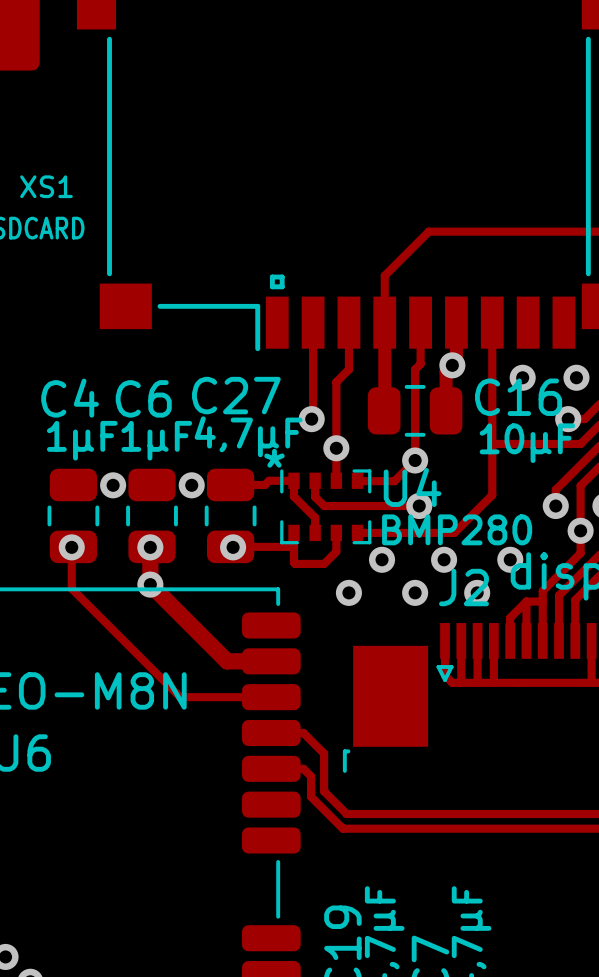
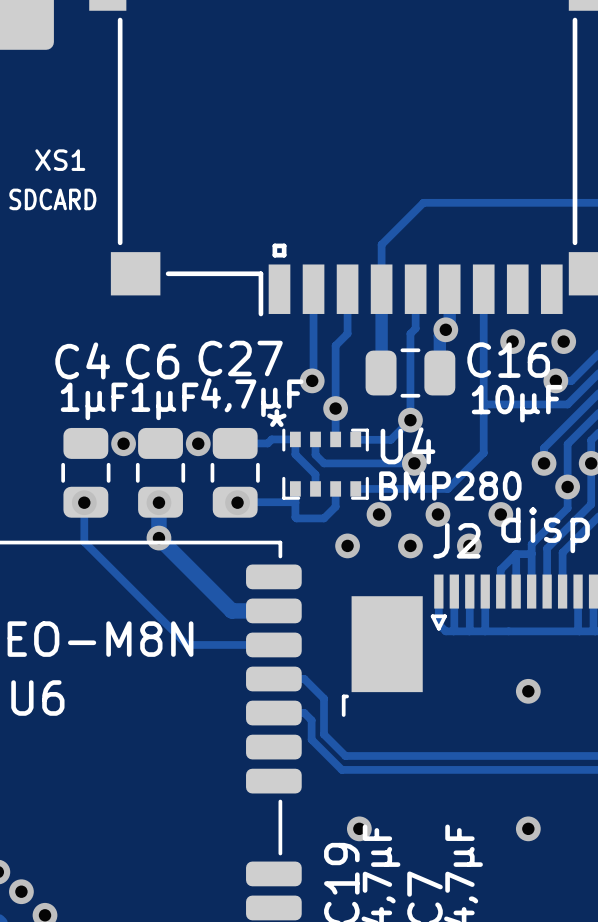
via: none -> (528, 691)
via: none -> (359, 828)
via: none -> (528, 828)

